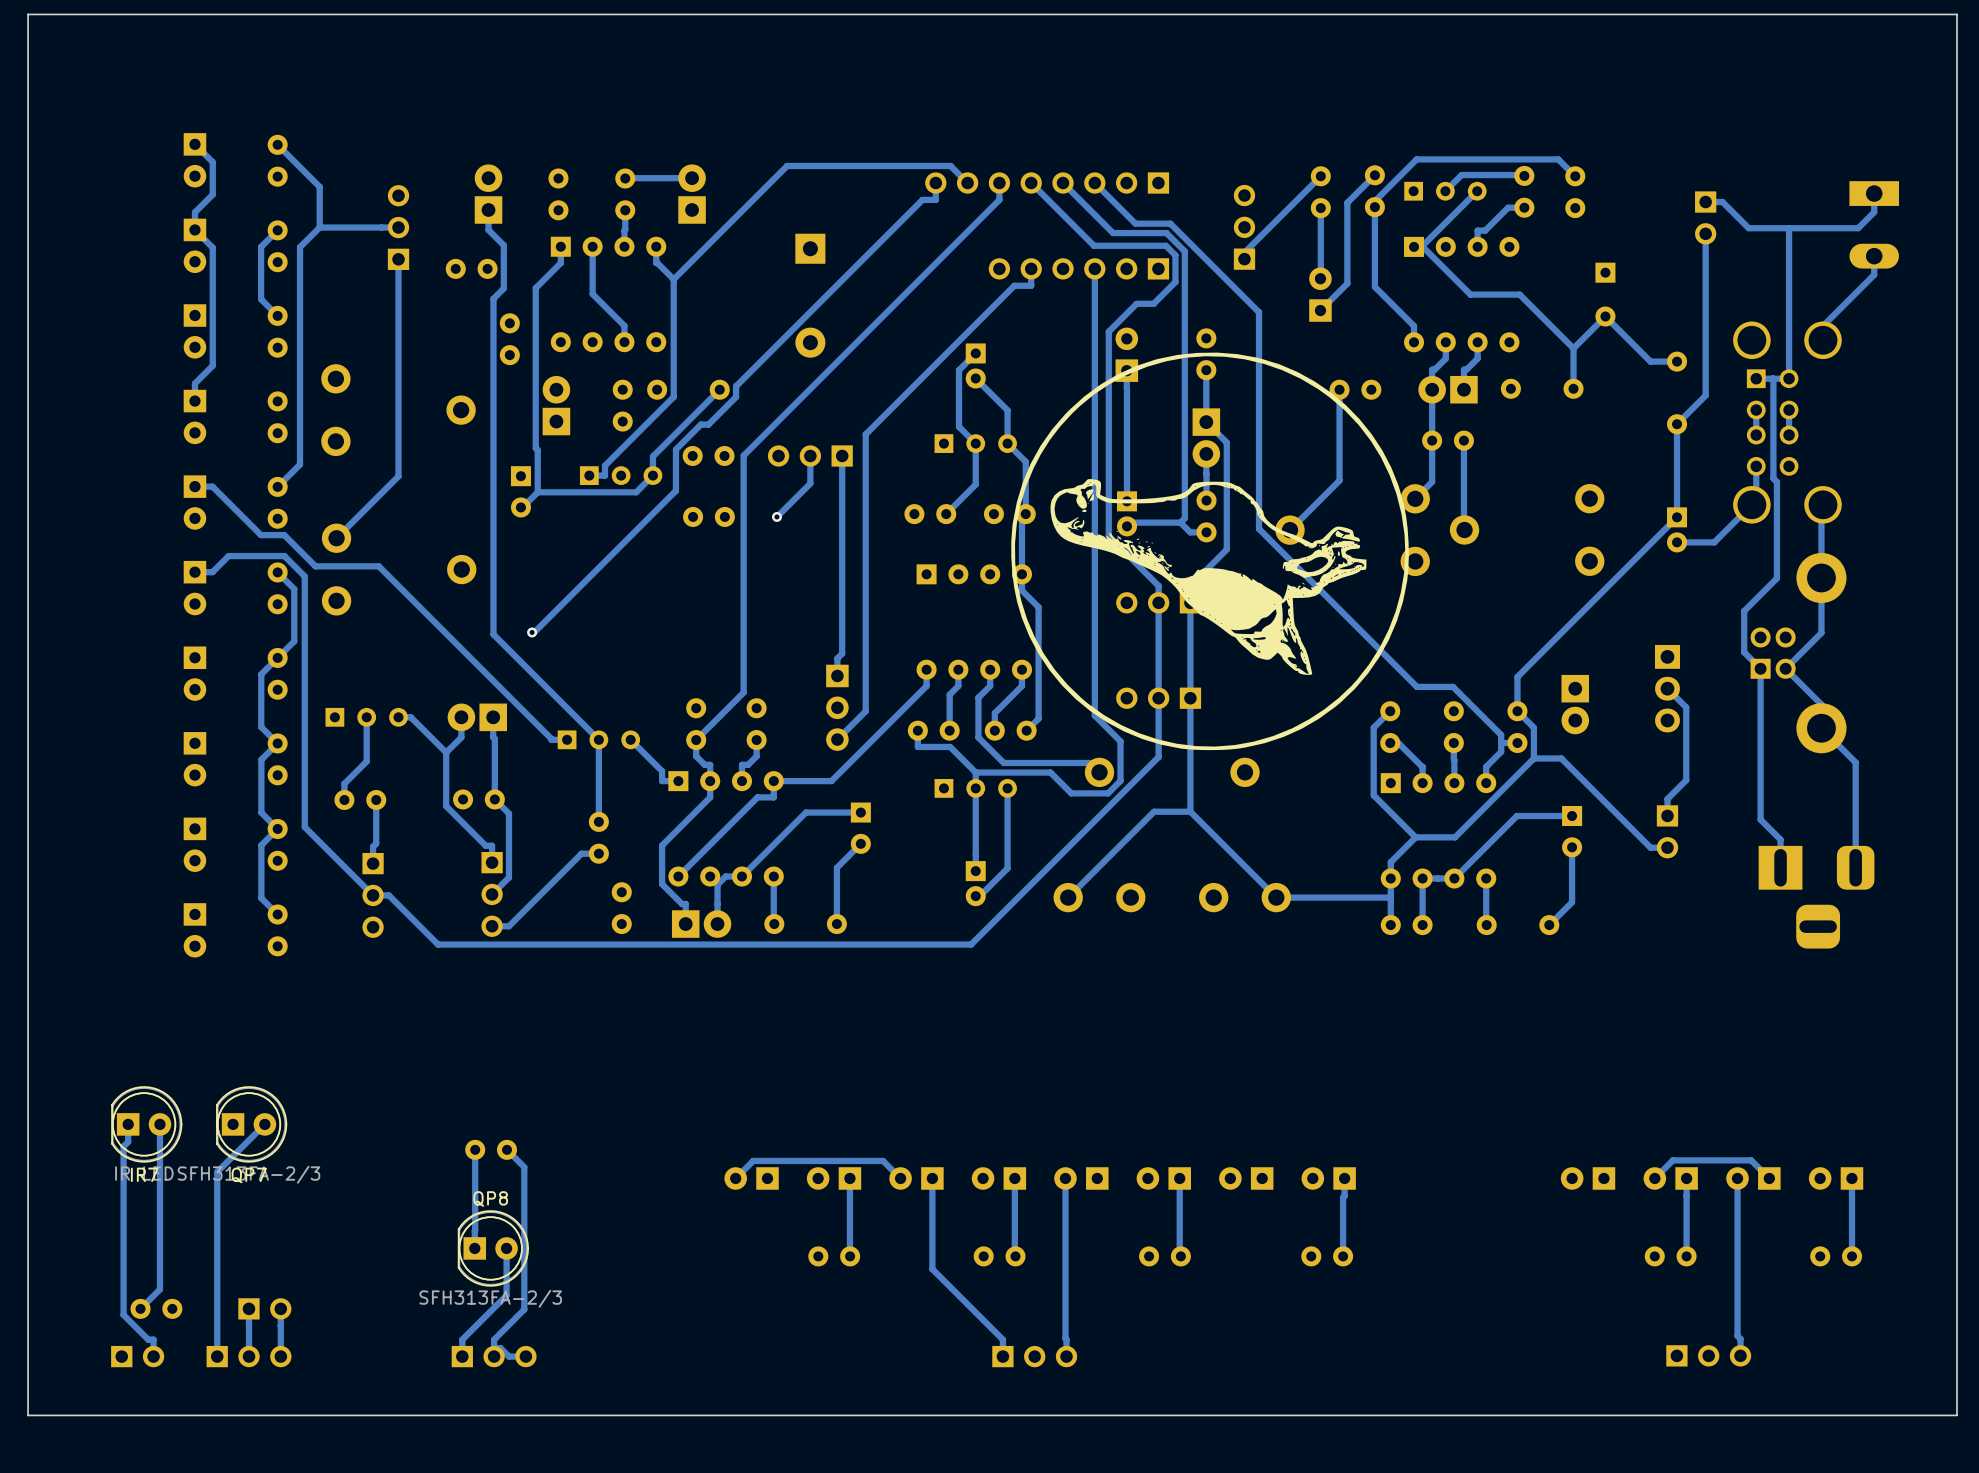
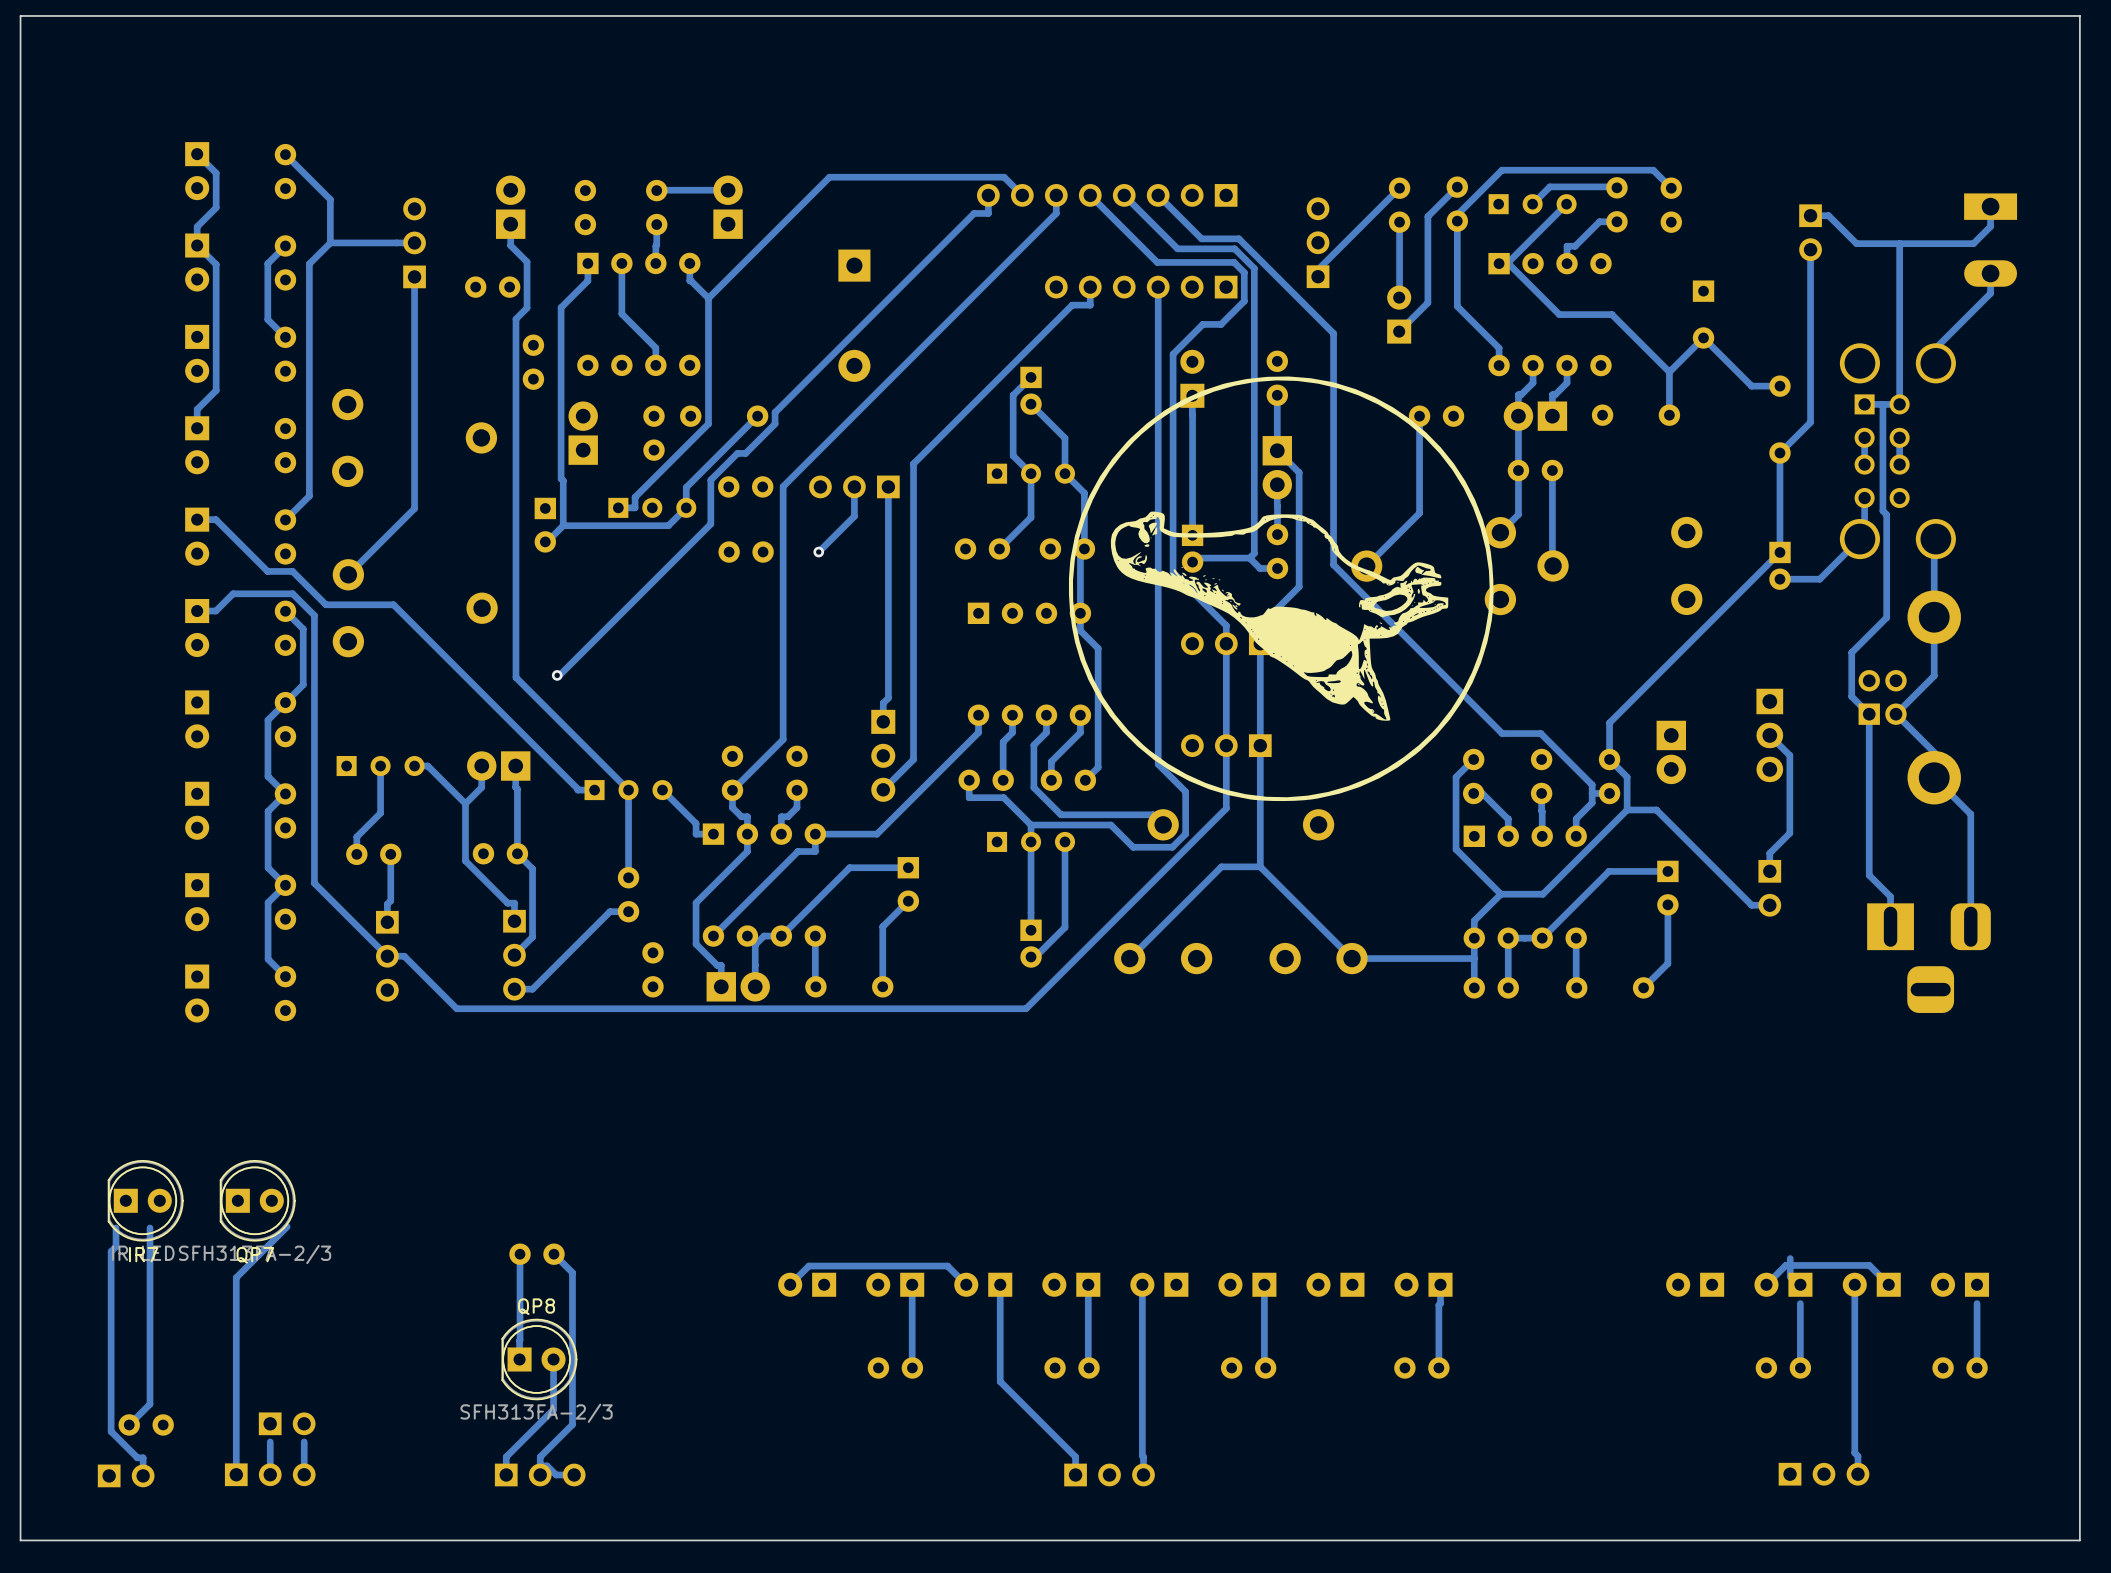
board edge: (1956, 14) (28, 14) (28, 1415) (1956, 1415) (1956, 14) -> (2079, 15) (2079, 1540) (20, 1540) (20, 15) (2079, 15)
track: (128, 1124) (128, 1141) (123, 1146) (123, 1314) (148, 1339) (153, 1339) (153, 1356) -> (116, 1227) (116, 1246) (111, 1251) (111, 1431) (137, 1457) (143, 1457) (143, 1475)
track: (159, 1124) (159, 1289) (140, 1308) -> (150, 1227) (150, 1404) (129, 1424)
track: (264, 1124) (217, 1172) (217, 1356) -> (287, 1226) (236, 1277) (236, 1474)
track: (475, 1149) (474, 1248) -> (520, 1254) (519, 1359)
part position: (491, 1149) -> (537, 1254)
track: (507, 1149) (524, 1167) (524, 1309) (494, 1339) (494, 1356) -> (554, 1254) (572, 1272) (572, 1424) (540, 1456) (540, 1474)
part position: (751, 1178) -> (807, 1284)
part position: (834, 1178) -> (895, 1284)
track: (849, 1178) (850, 1256) -> (912, 1284) (912, 1367)
track: (900, 1178) (883, 1160) (753, 1160) (735, 1178) -> (966, 1284) (947, 1266) (808, 1266) (790, 1284)
part position: (916, 1178) -> (983, 1284)
track: (932, 1178) (932, 1269) (1002, 1339) (1002, 1356) -> (1000, 1284) (1000, 1381) (1075, 1456) (1075, 1474)
part position: (998, 1178) -> (1071, 1284)
track: (1014, 1178) (1015, 1256) -> (1088, 1284) (1089, 1367)
track: (1065, 1178) (1066, 1356) -> (1142, 1284) (1143, 1474)
part position: (1081, 1178) -> (1159, 1284)
part position: (1163, 1178) -> (1247, 1284)
track: (1179, 1178) (1180, 1256) -> (1264, 1284) (1265, 1367)
part position: (1246, 1178) -> (1335, 1284)
part position: (1328, 1178) -> (1423, 1284)
track: (1344, 1178) (1343, 1256) -> (1440, 1284) (1438, 1367)
part position: (1588, 1178) -> (1695, 1284)
part position: (1670, 1178) -> (1783, 1284)
track: (1737, 1178) (1737, 1335) (1740, 1338) (1740, 1355) -> (1854, 1284) (1854, 1452) (1857, 1456) (1857, 1474)
part position: (1753, 1178) -> (1871, 1284)
track: (1769, 1178) (1751, 1160) (1672, 1160) (1654, 1178) -> (1888, 1284) (1869, 1265) (1785, 1265) (1766, 1284)
part position: (1836, 1178) -> (1960, 1284)
track: (1686, 1196) (1686, 1256) -> (1800, 1303) (1800, 1367)
track: none -> (1977, 1303) (1977, 1367)
QP8 position: (493, 1248) -> (539, 1359)
track: (506, 1248) (506, 1295) (462, 1339) (462, 1356) -> (553, 1359) (553, 1409) (506, 1456) (506, 1474)
part position: (834, 1256) -> (895, 1367)
part position: (999, 1256) -> (1072, 1367)
part position: (1164, 1256) -> (1248, 1367)
part position: (1327, 1256) -> (1421, 1367)
part position: (1670, 1256) -> (1783, 1367)
part position: (1836, 1256) -> (1960, 1367)
part position: (156, 1308) -> (146, 1424)
part position: (264, 1308) -> (287, 1423)
track: (494, 1348) (500, 1348) (509, 1356) (525, 1356) -> (540, 1465) (547, 1465) (556, 1474) (574, 1474)
track: none -> (270, 1441) (270, 1474)
track: none -> (304, 1441) (304, 1474)
part position: (1708, 1355) -> (1824, 1474)
part position: (137, 1356) -> (126, 1475)
part position: (249, 1356) -> (270, 1474)
part position: (494, 1356) -> (540, 1474)
part position: (1034, 1356) -> (1109, 1474)

